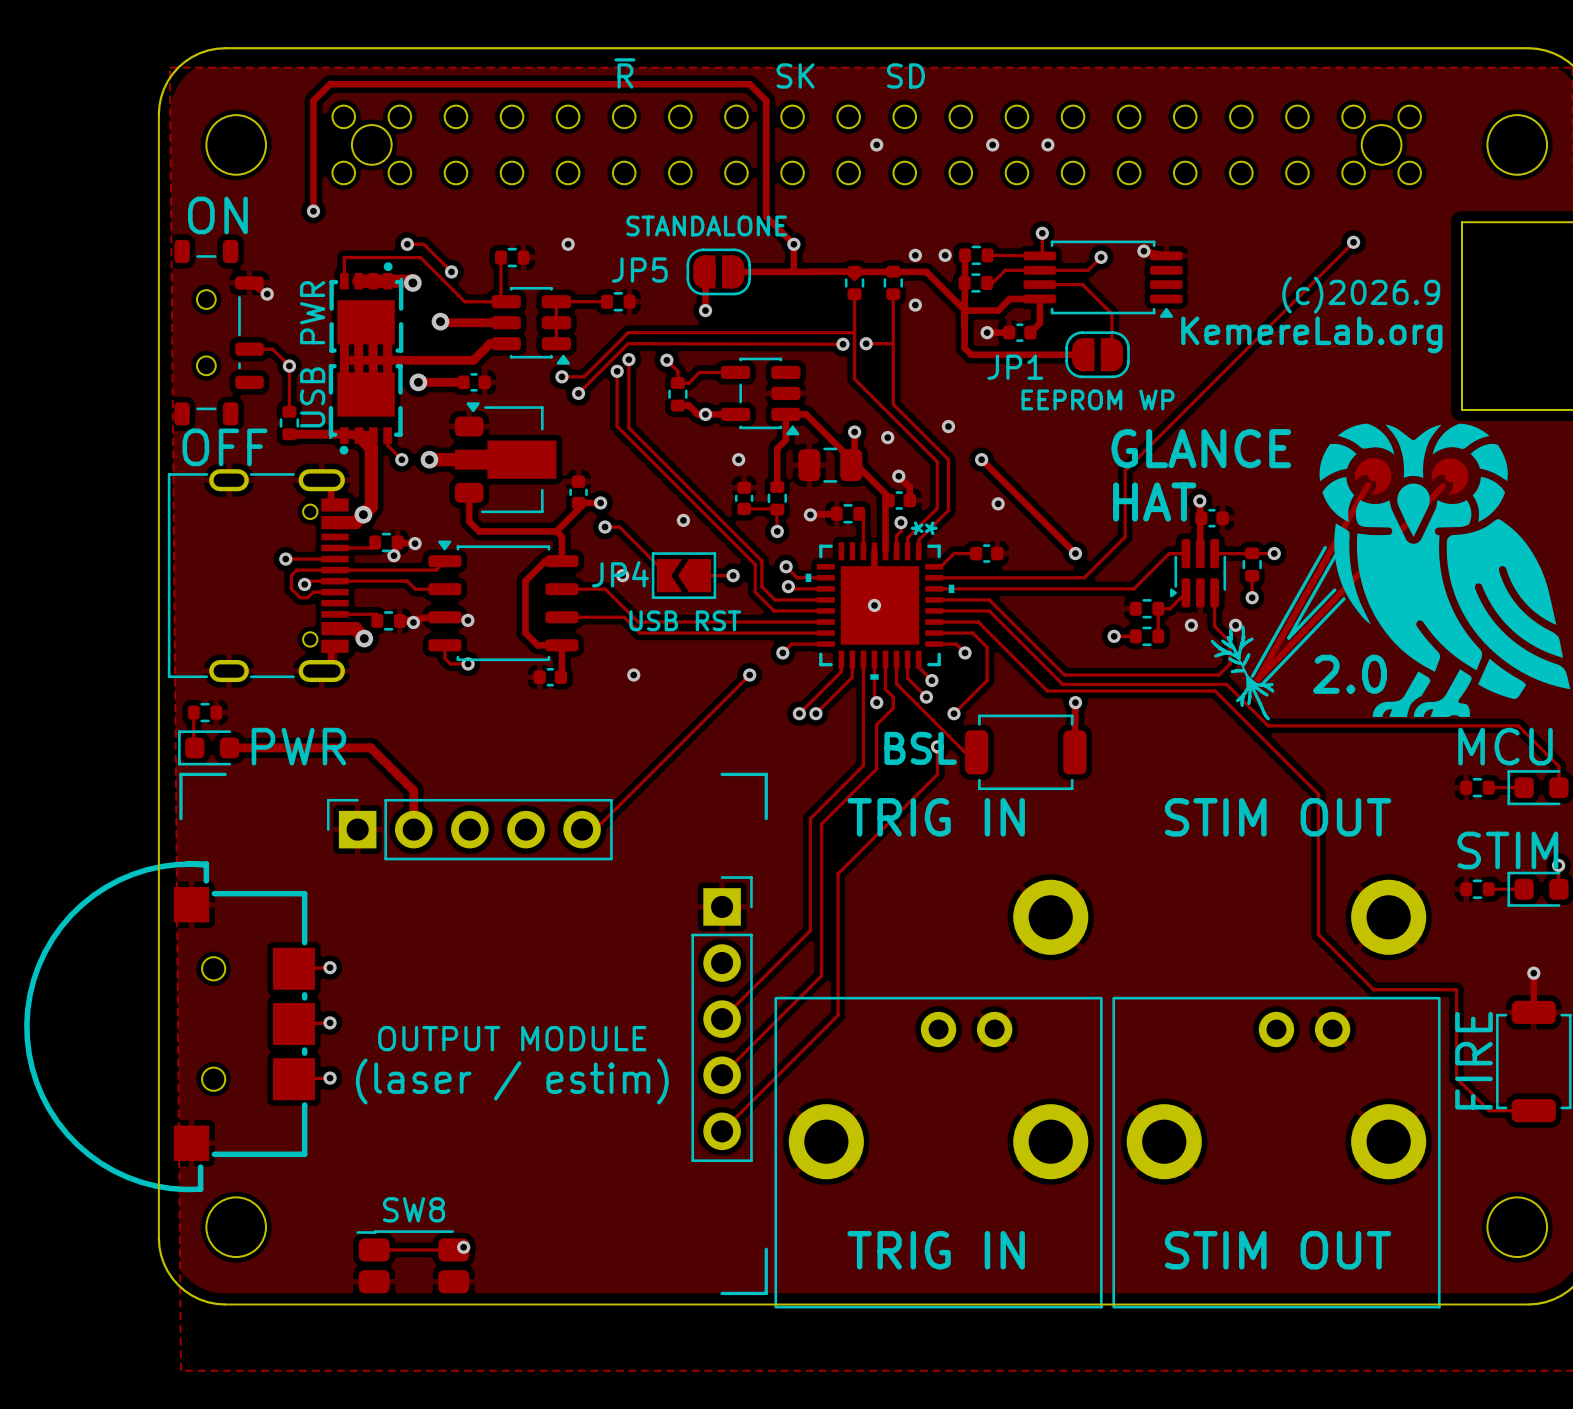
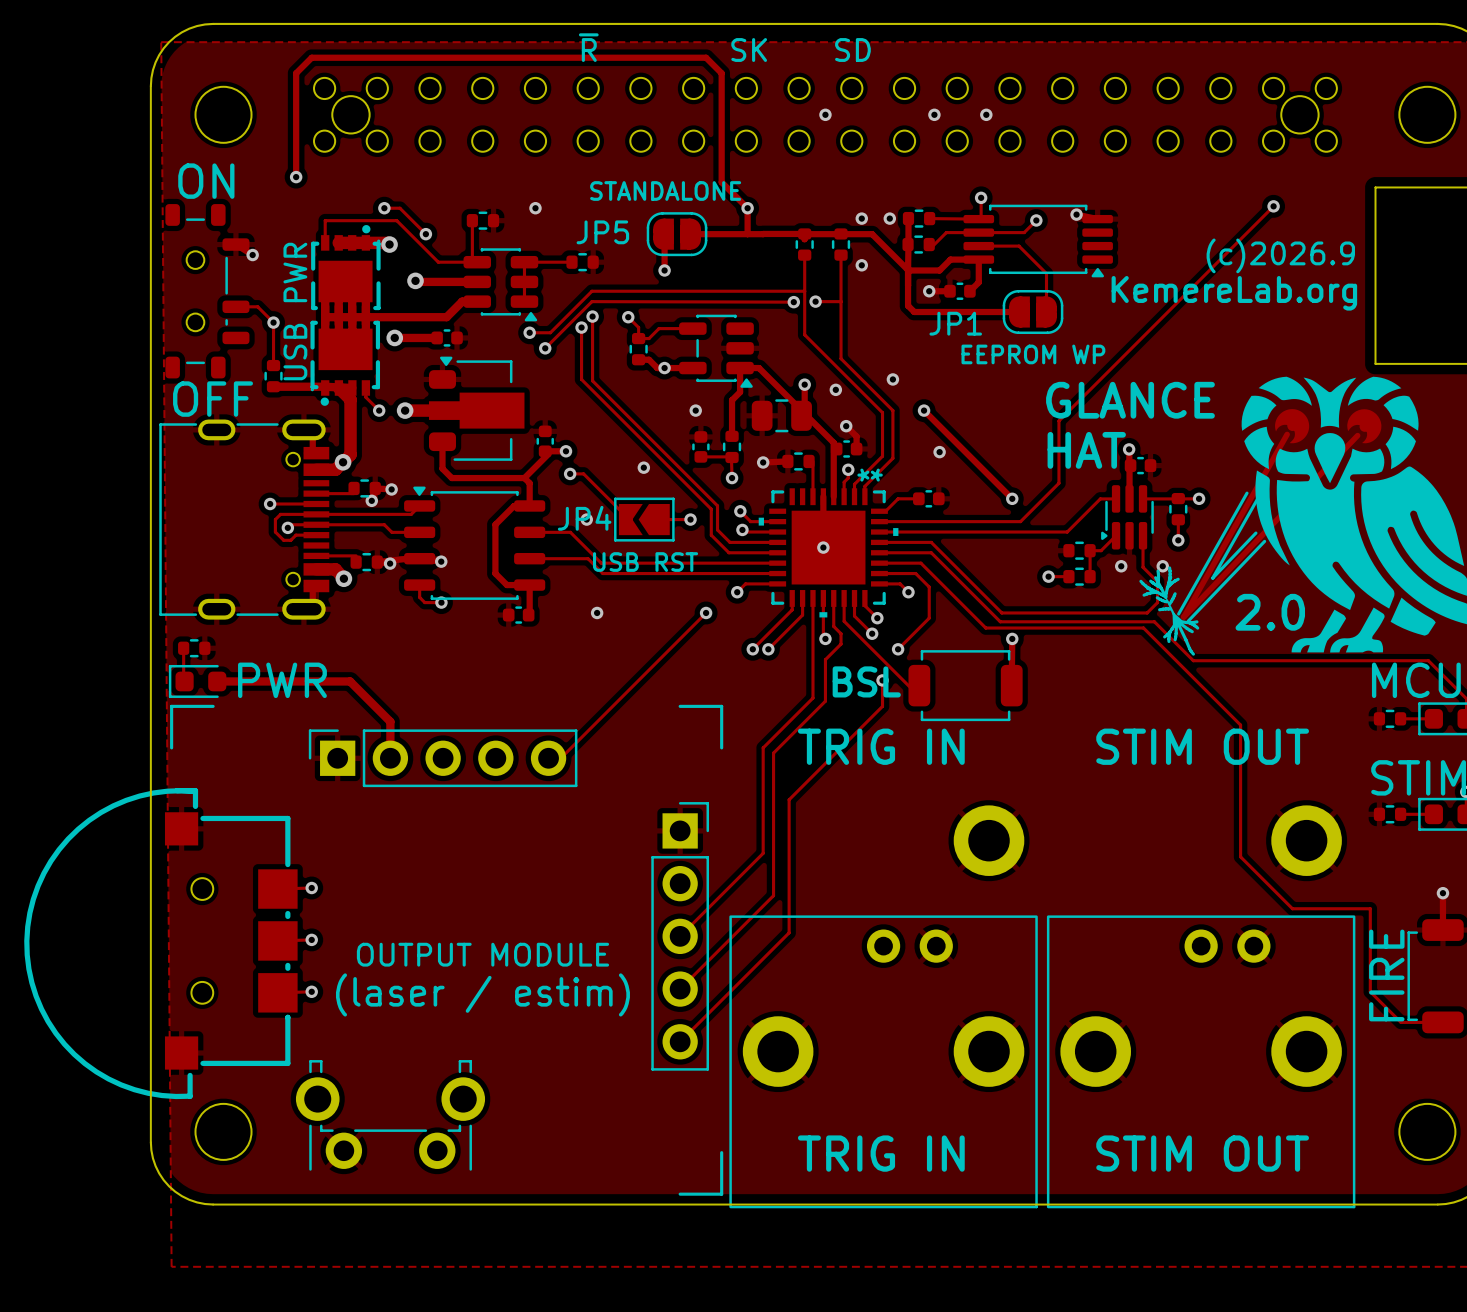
part: none -> (390, 1115)
track: (463, 1247) (453, 1249) (374, 1249) -> none
via: (463, 1247) -> none
SW8: (412, 1261) -> none

